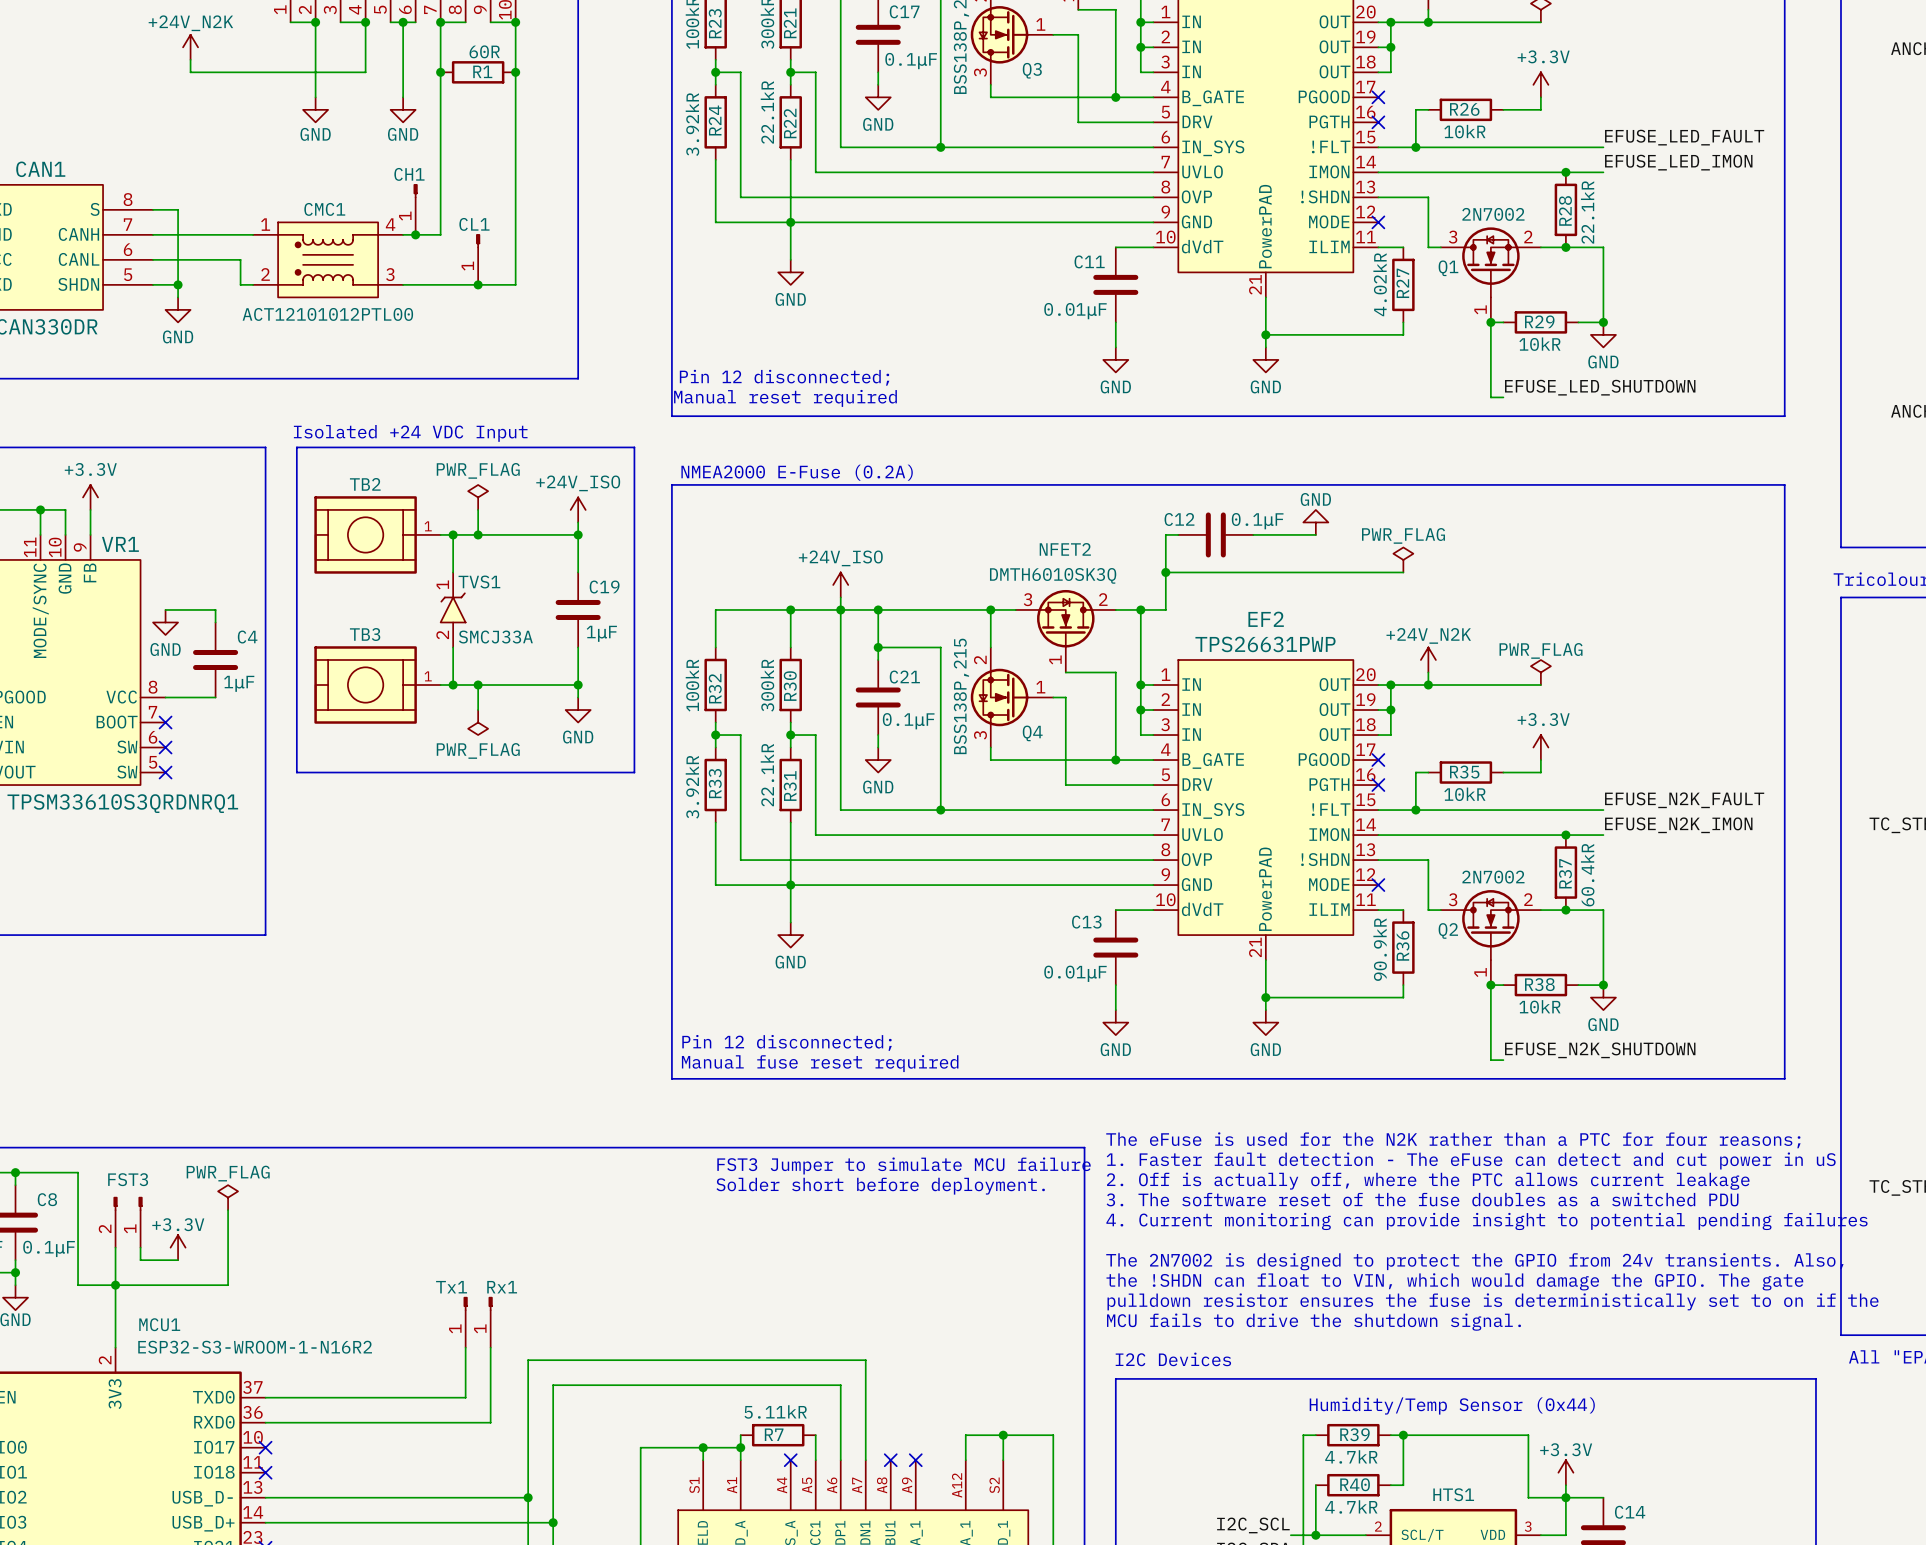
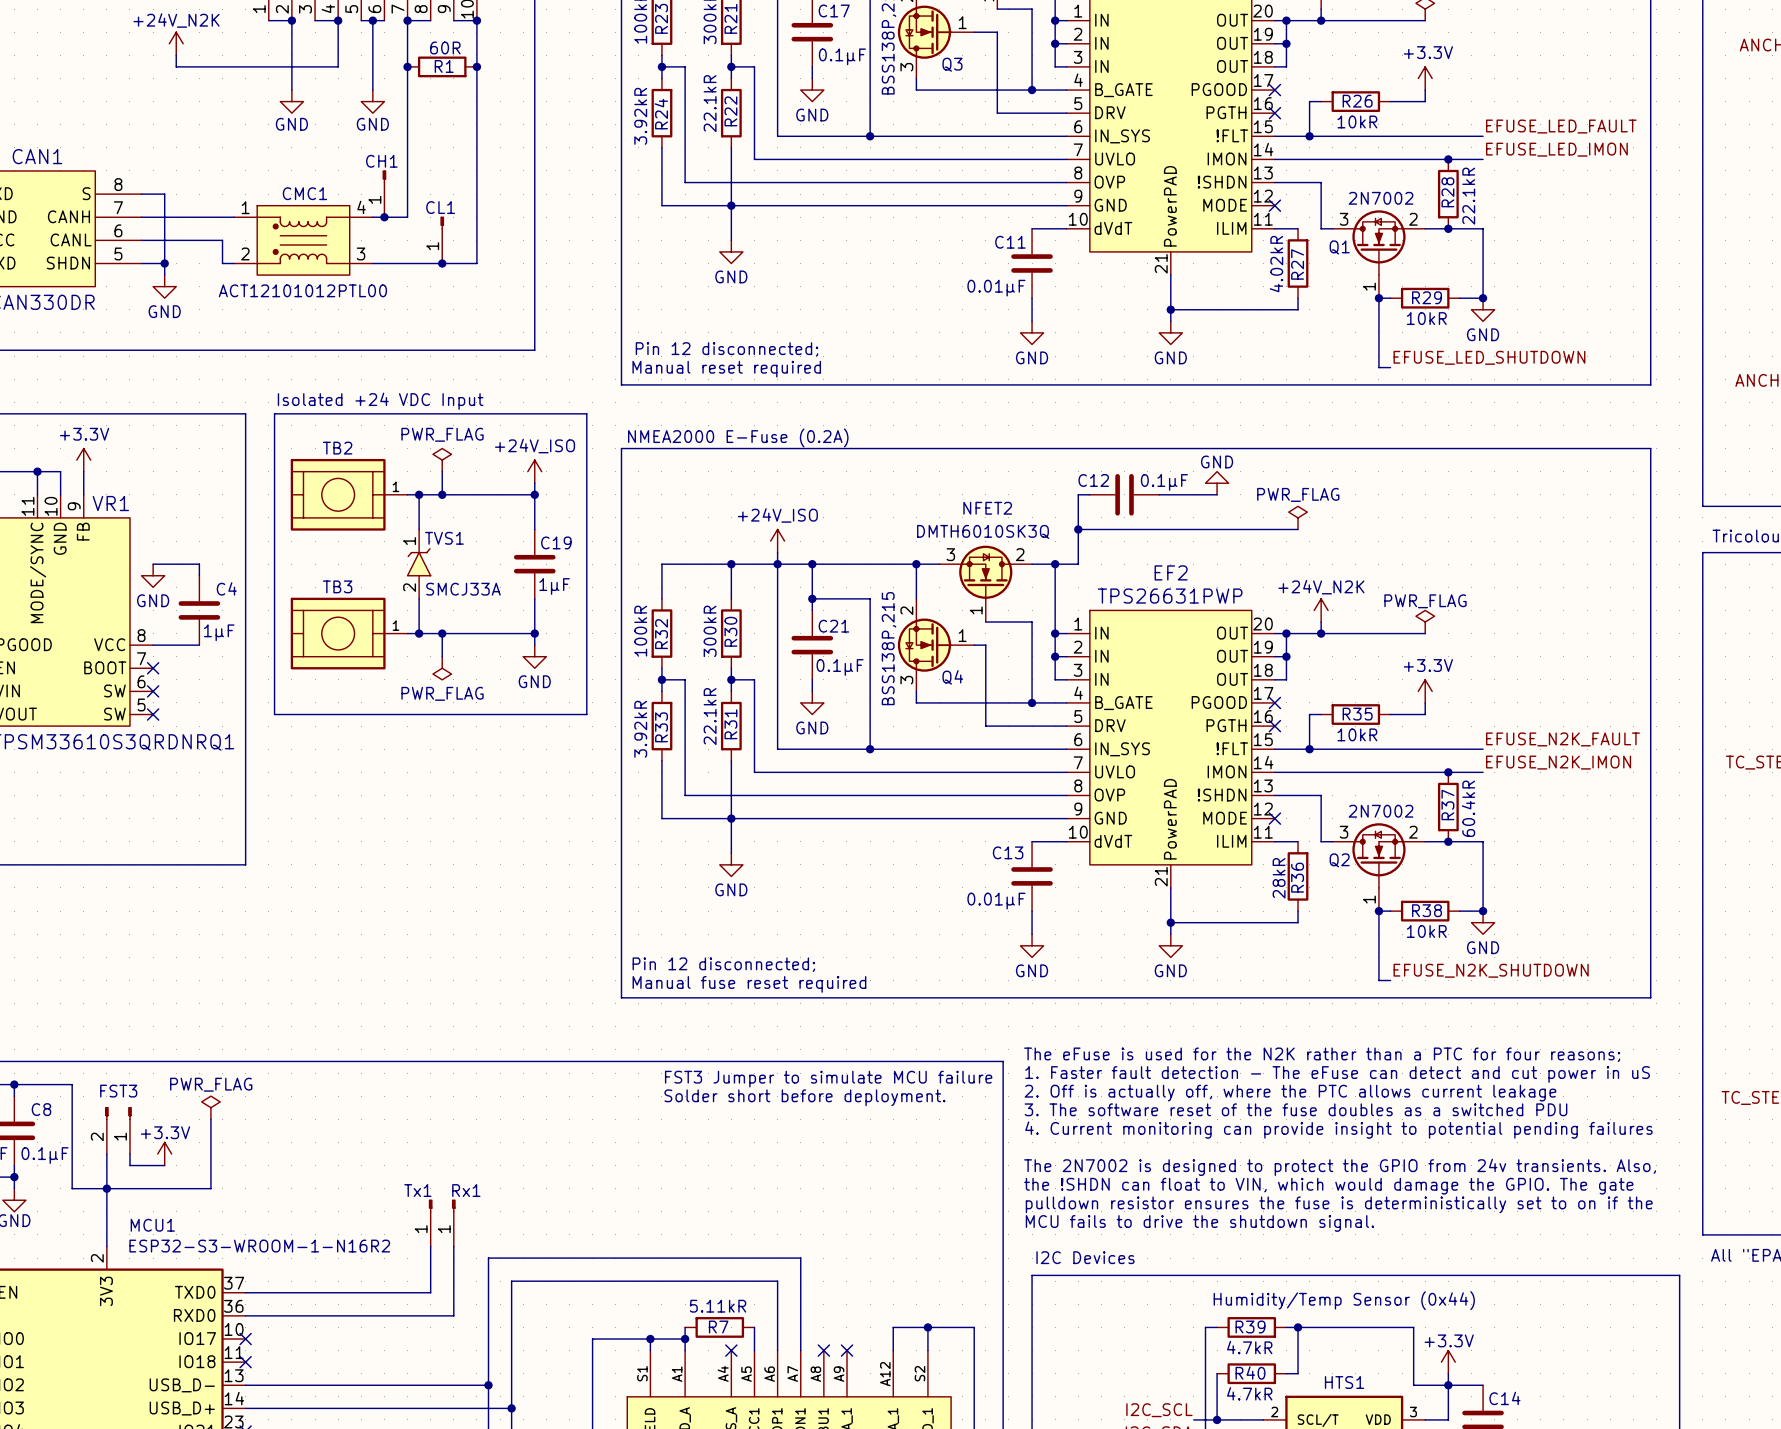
R36 value: 90.9kR (1380, 949) -> 28kR (1279, 878)

